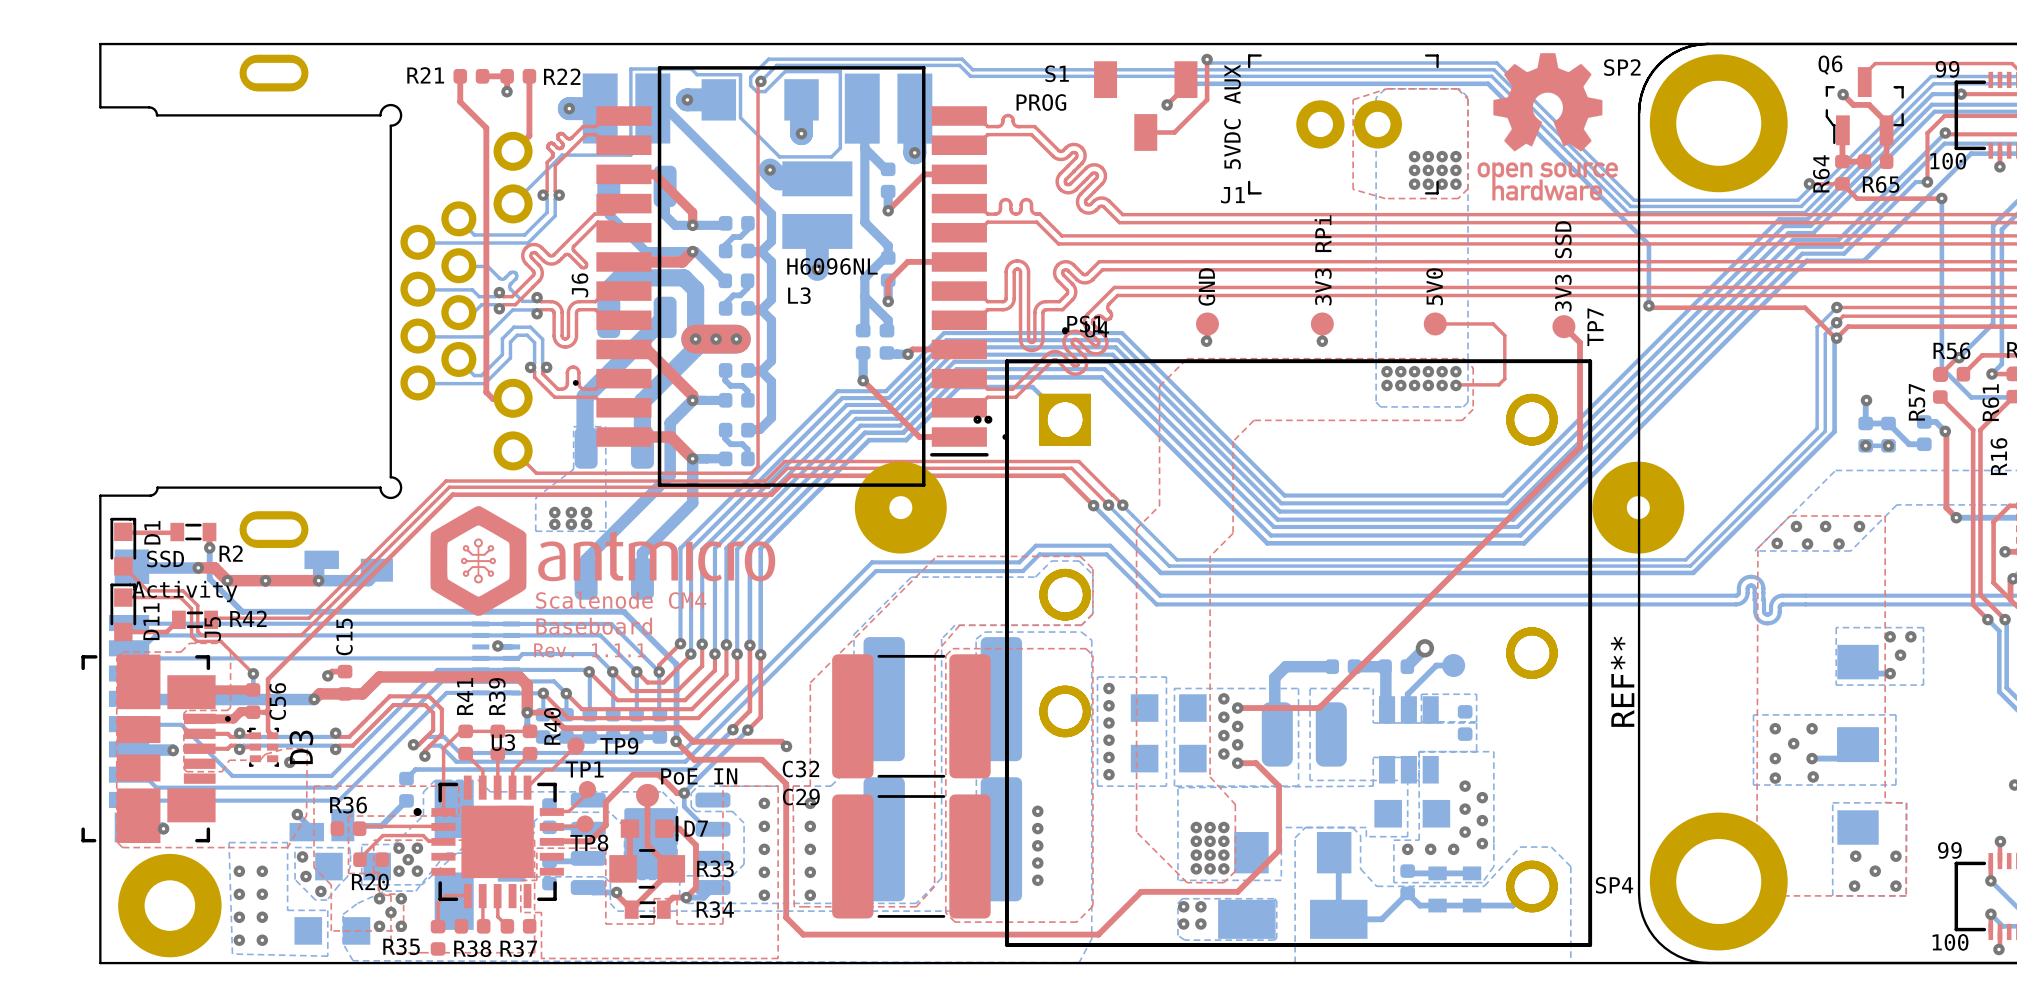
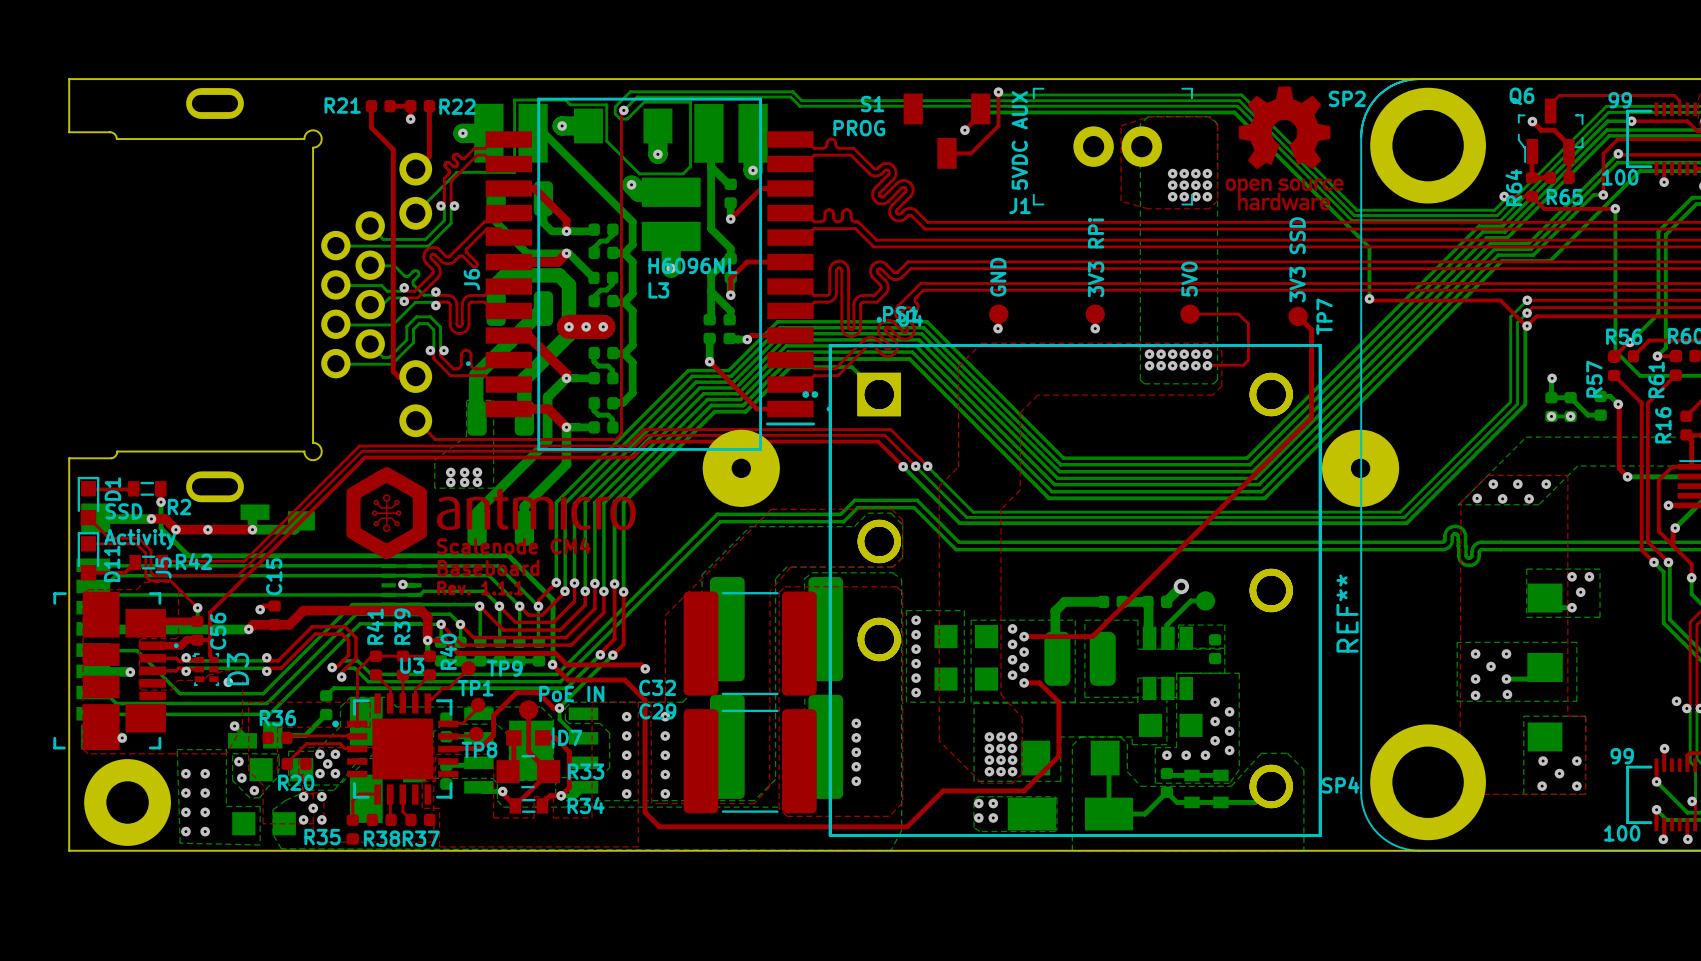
part footprint: [570, 792, 731, 895] -> [464, 707, 599, 794]

